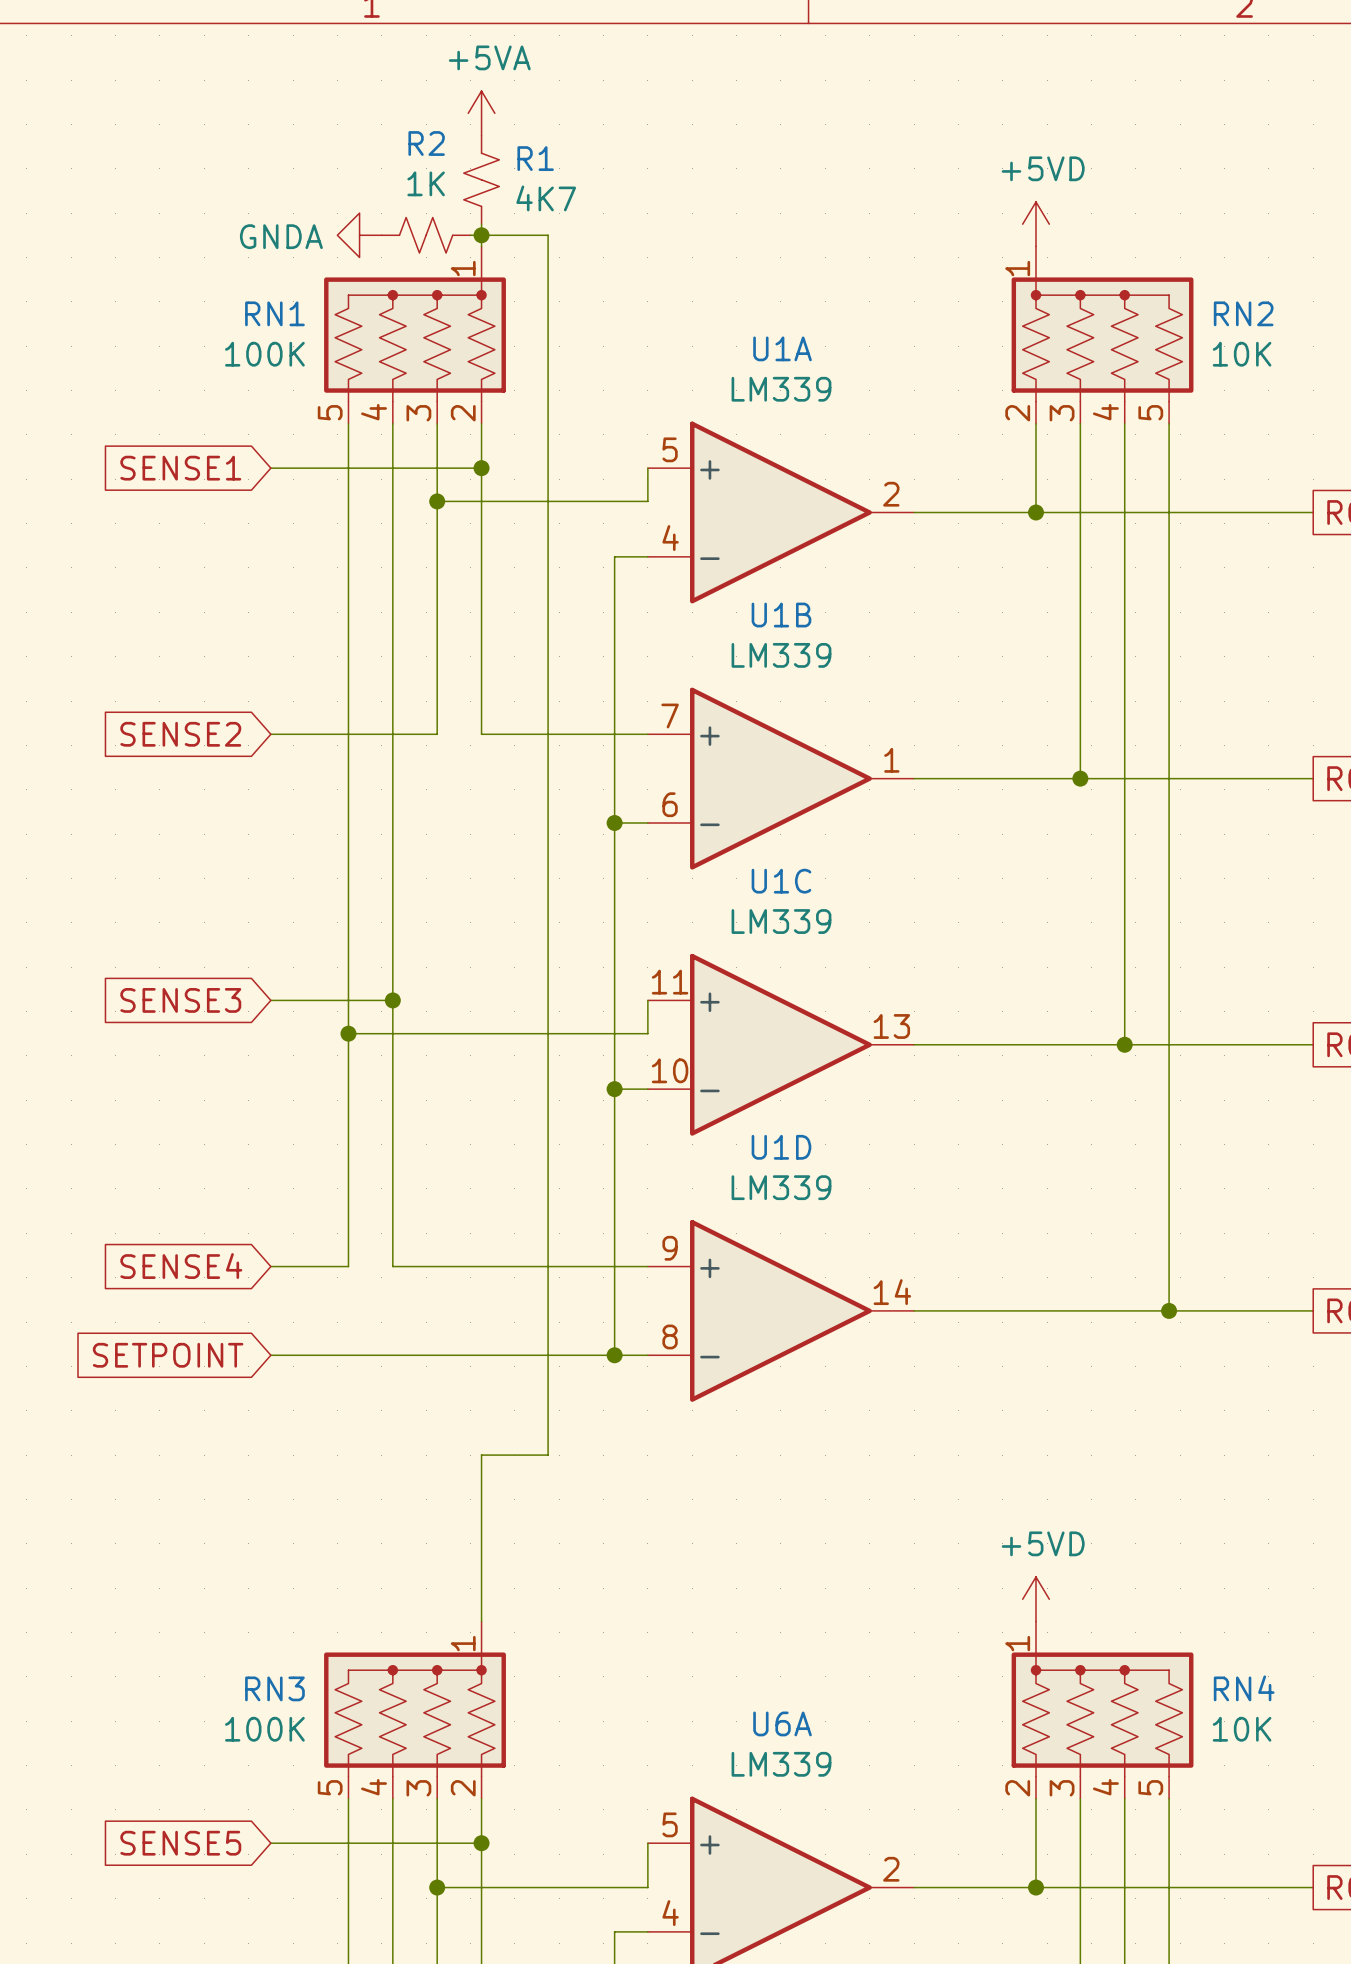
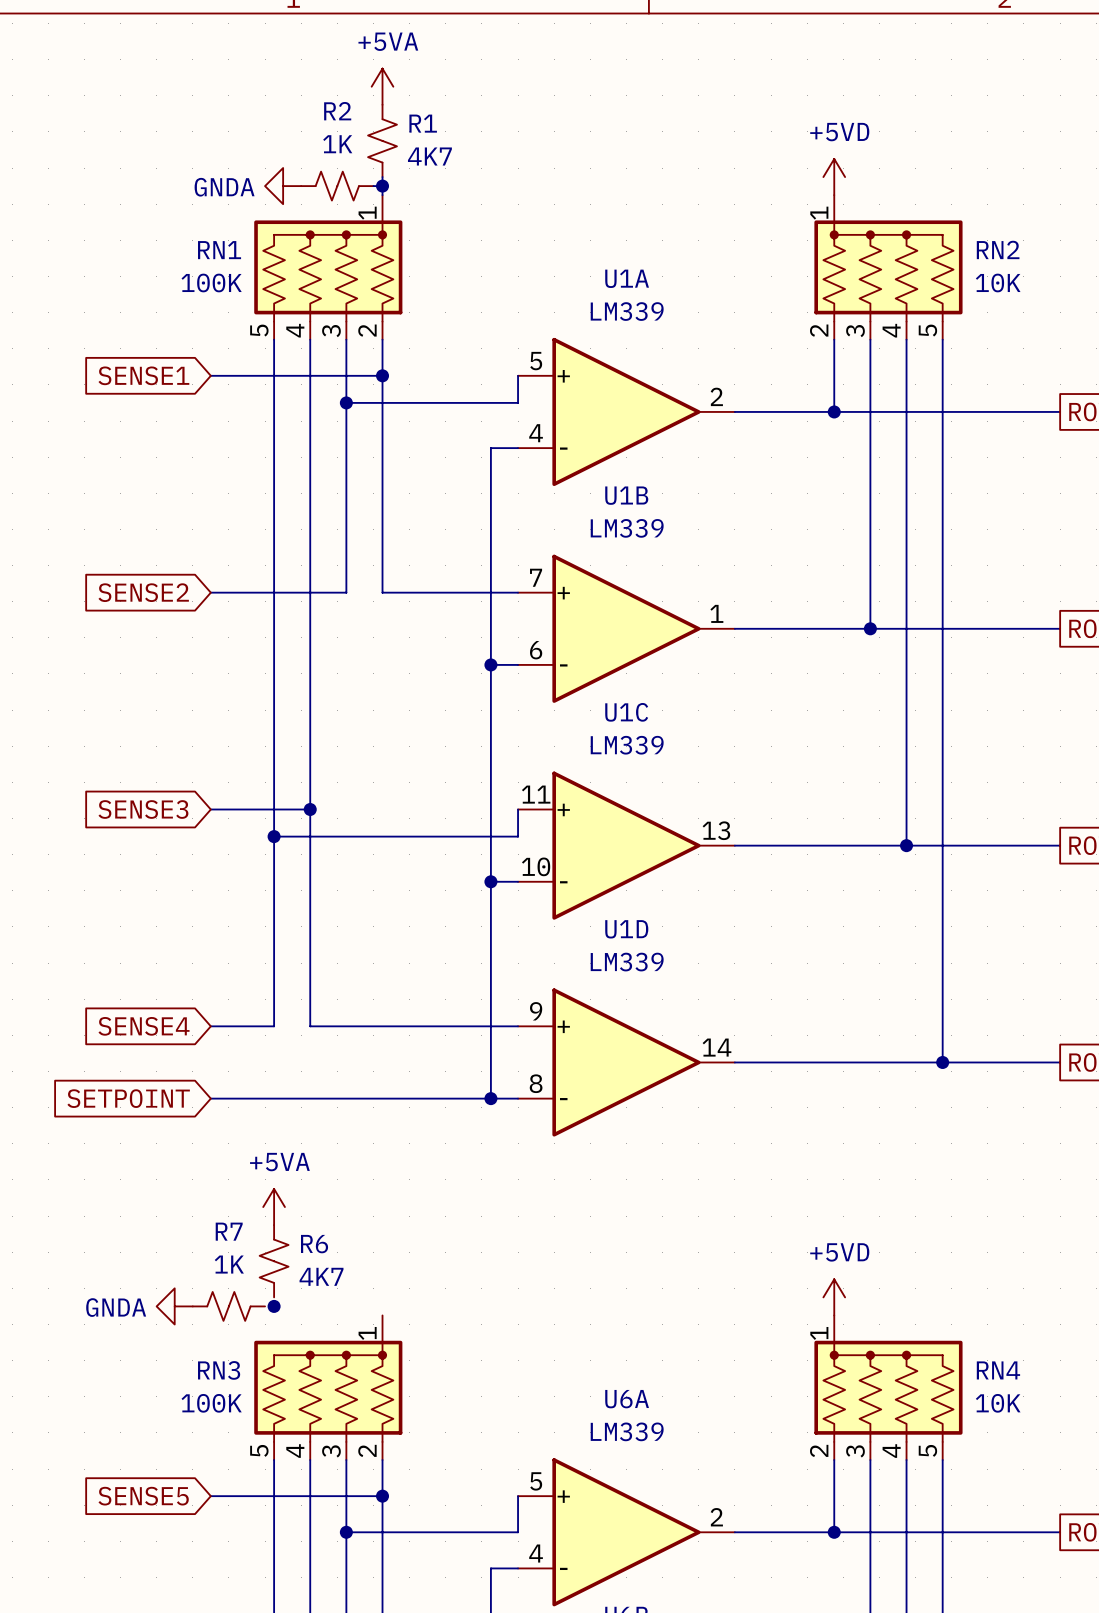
wire: (481, 235) (548, 235) (548, 1455) (481, 1455) (481, 1621) -> none
power symbol: none -> +5VA (274, 1207)
R6: none -> 4K7 (274, 1261)
power symbol: none -> GNDA (174, 1306)
R7: none -> 1K (228, 1306)
junction: none -> (274, 1306)

